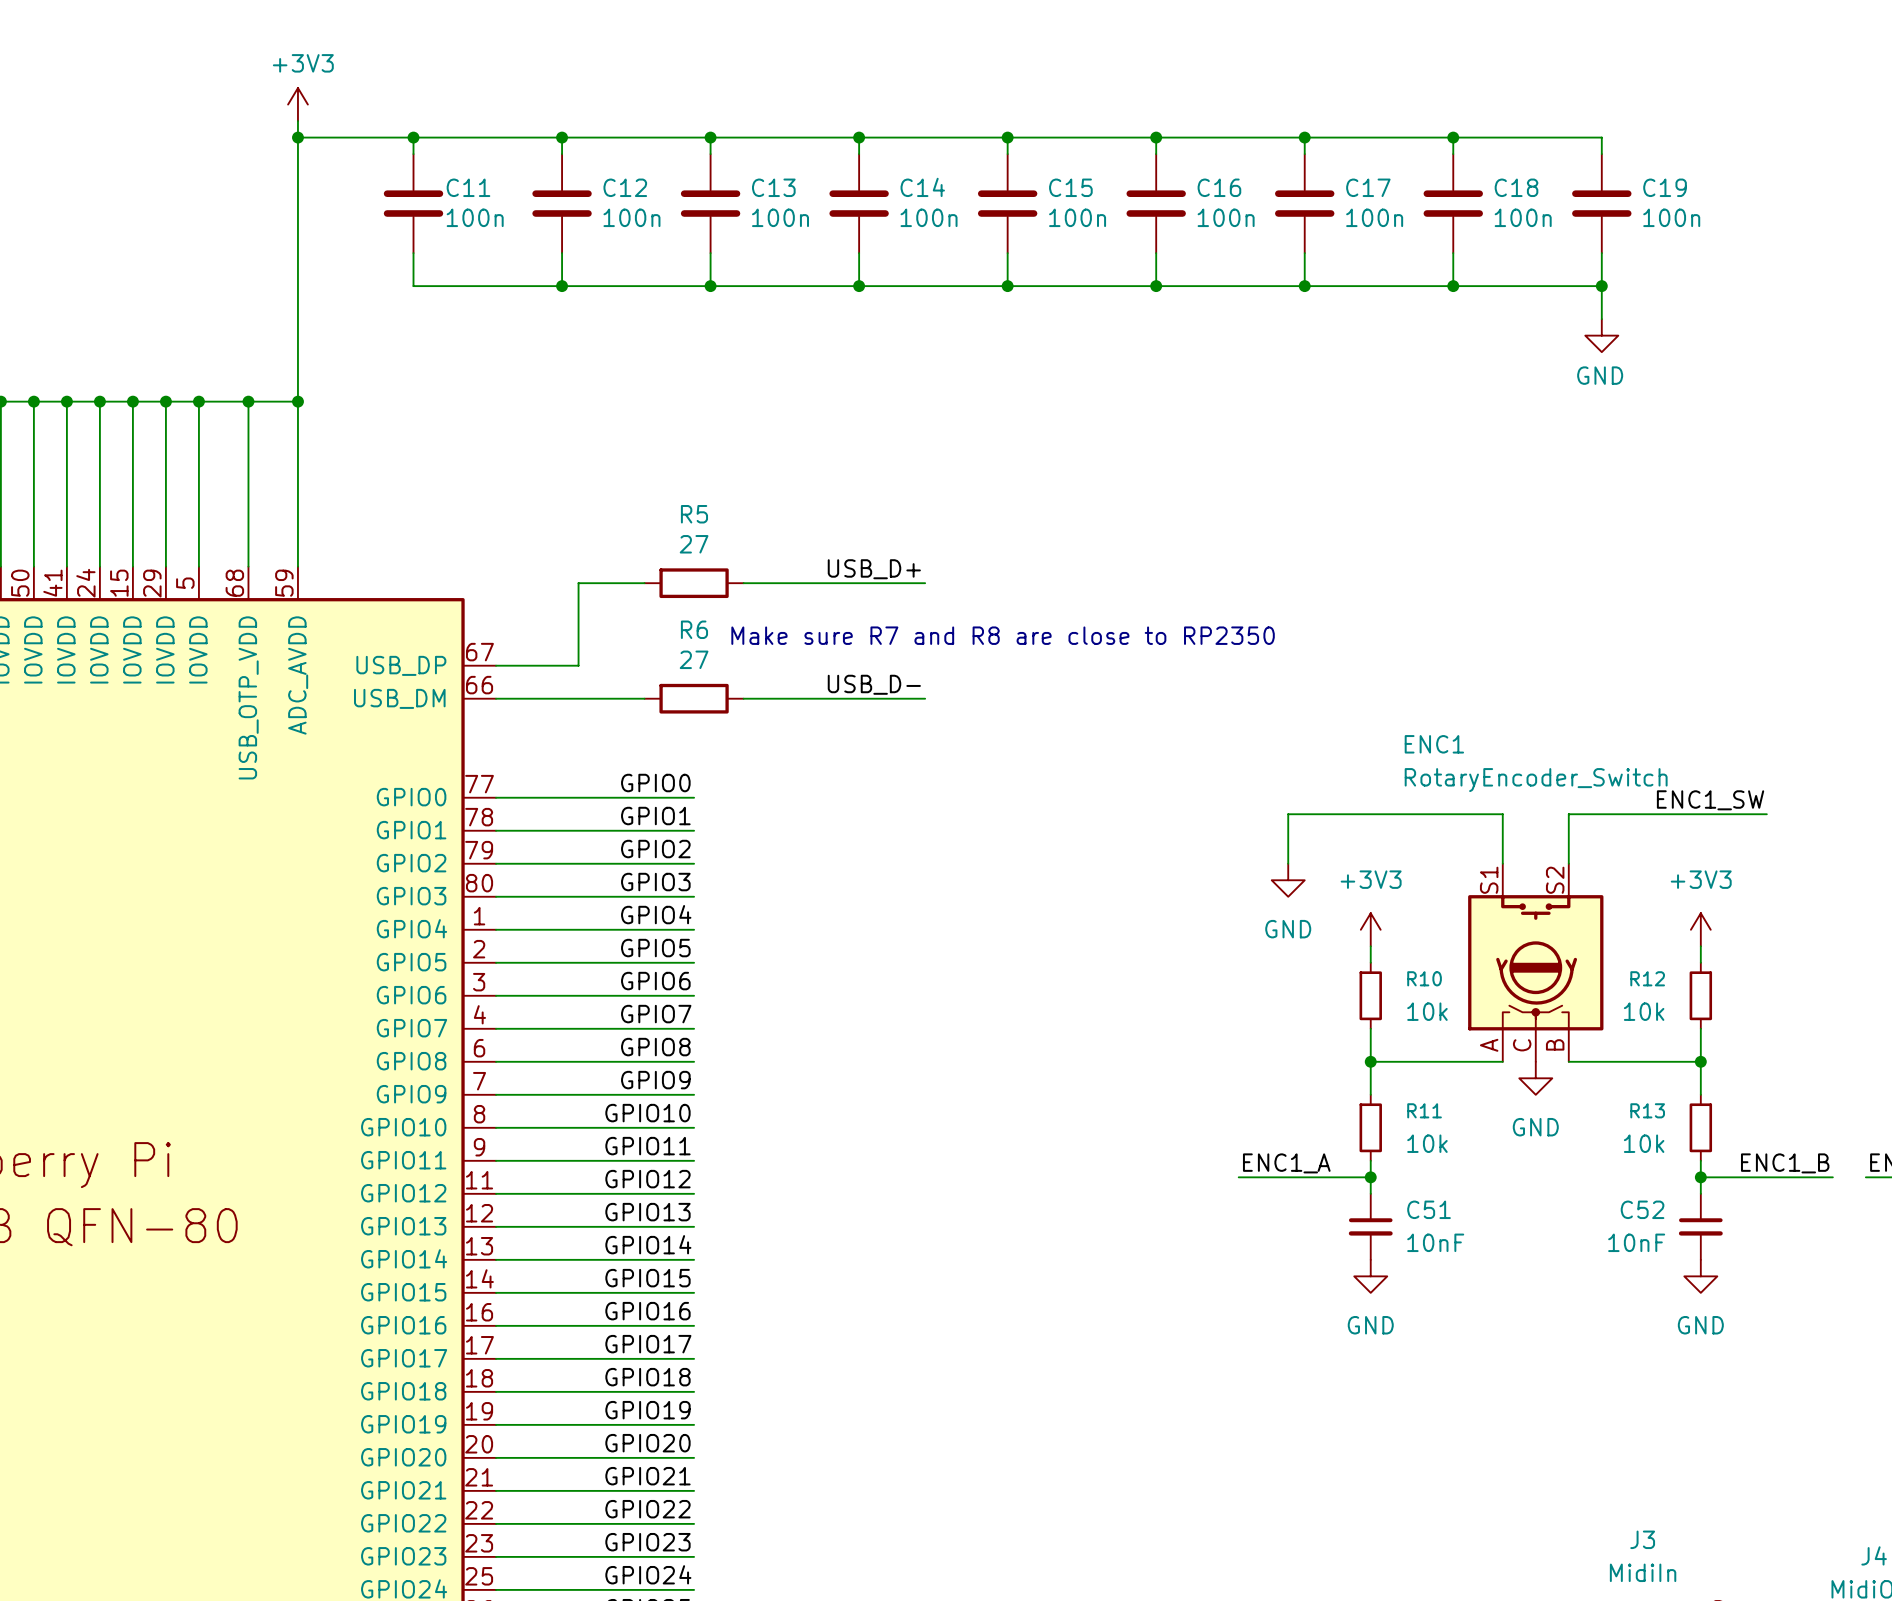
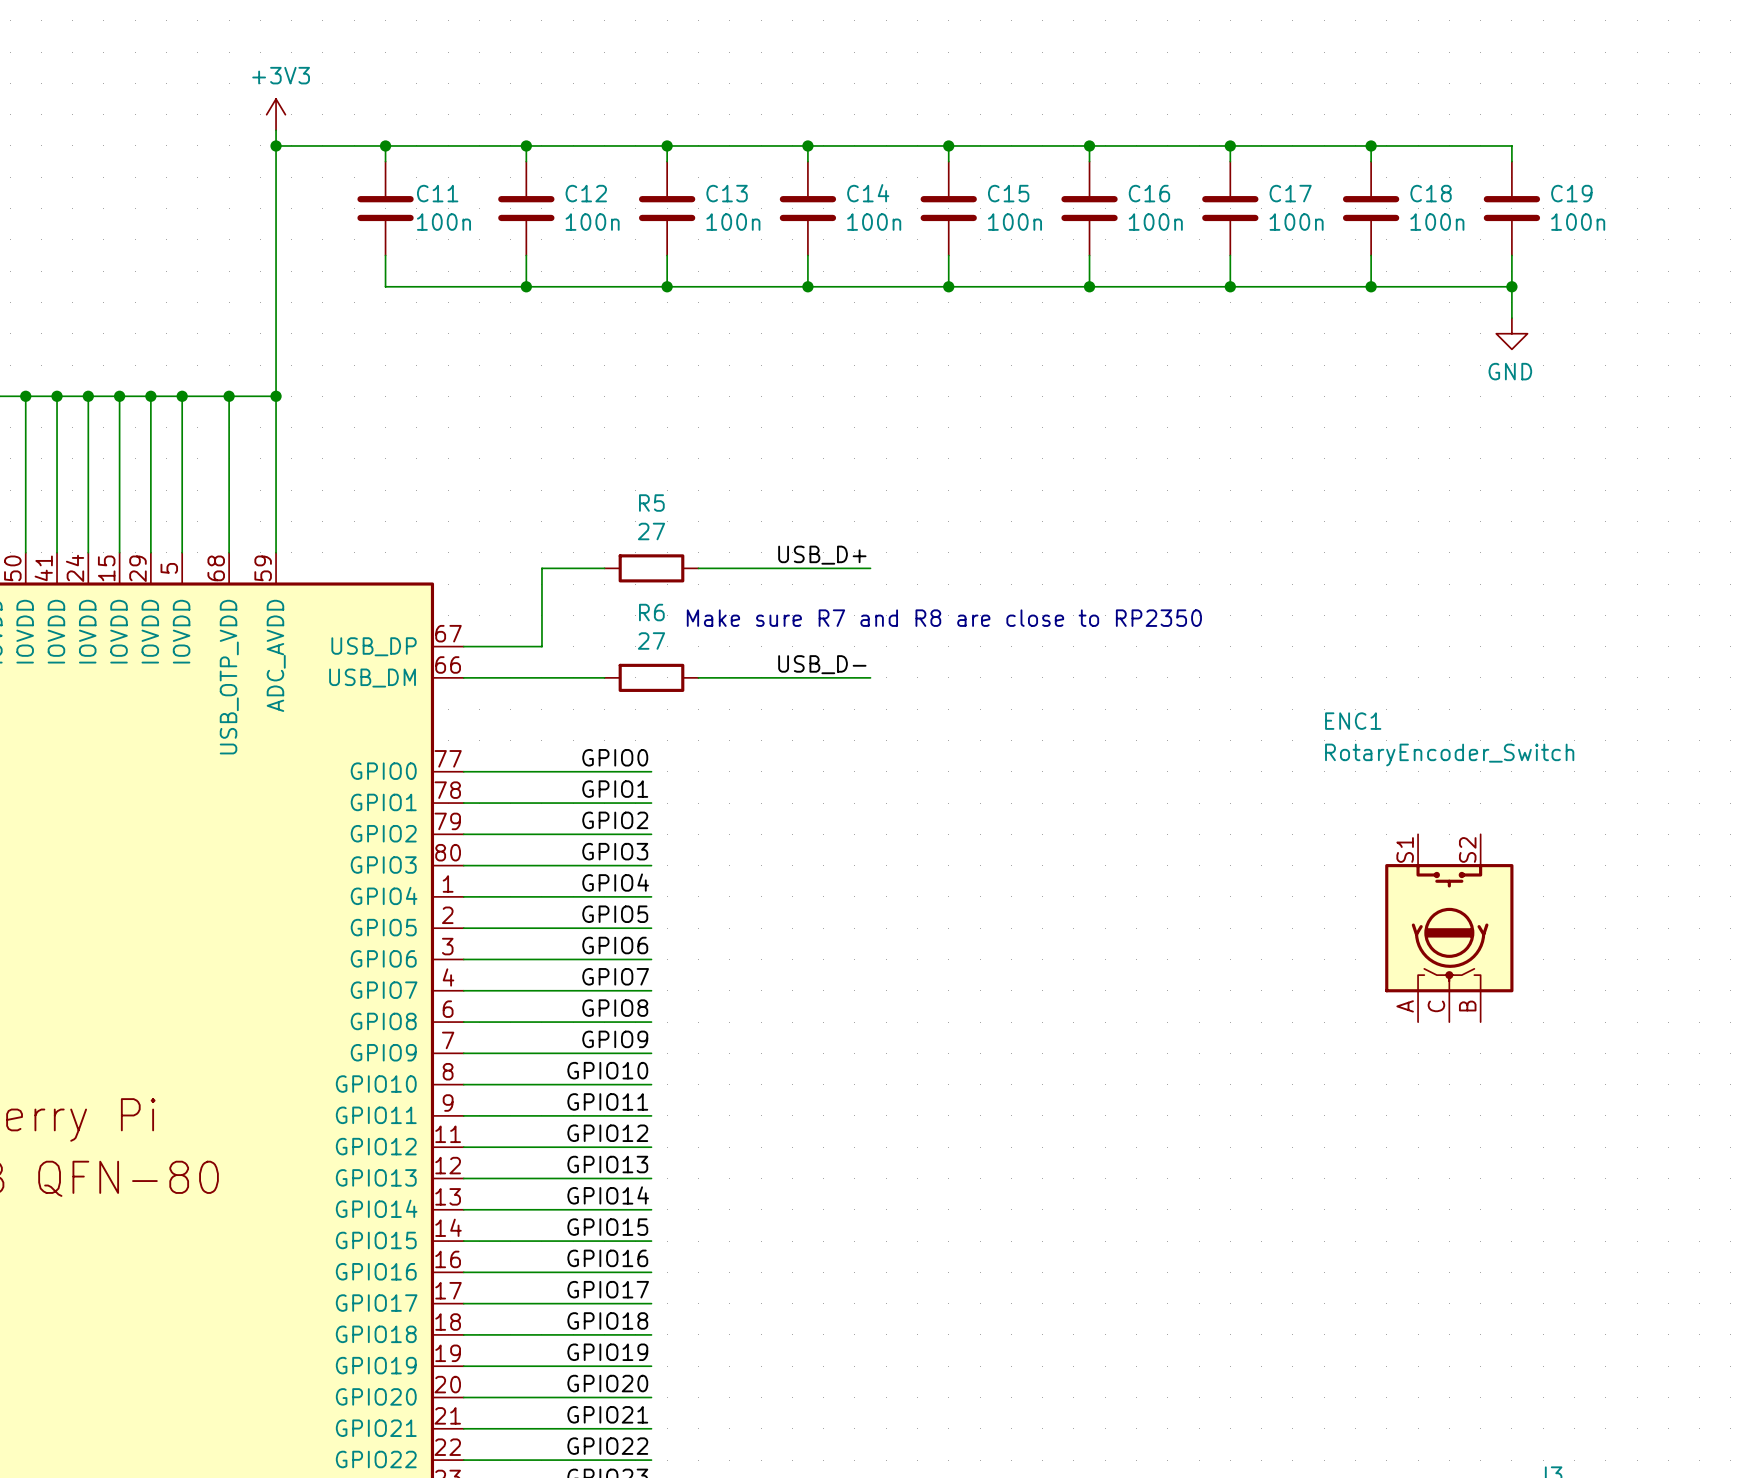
label: ENC1_SW (1710, 800) -> none
wire: (1766, 814) (1568, 814) (1568, 863) -> none
wire: (1288, 863) (1288, 814) (1502, 814) (1502, 863) -> none
power symbol: GND (1288, 880) -> none
power symbol: +3V3 (1370, 929) -> none
power symbol: +3V3 (1700, 929) -> none
wire: (1370, 946) (1370, 962) -> none
wire: (1700, 946) (1700, 962) -> none
R10: 10k (1370, 995) -> none
R12: 10k (1700, 995) -> none
wire: (1370, 1028) (1370, 1094) -> none
wire: (1700, 1028) (1700, 1094) -> none
wire: (1370, 1061) (1502, 1061) -> none
junction: (1370, 1061) -> none
wire: (1568, 1061) (1700, 1061) -> none
junction: (1700, 1061) -> none
power symbol: GND (1535, 1078) -> none
R11: 10k (1370, 1127) -> none
R13: 10k (1700, 1127) -> none
wire: (1370, 1160) (1370, 1193) -> none
wire: (1700, 1160) (1700, 1193) -> none
label: ENC1_A (1286, 1163) -> none
label: ENC1_B (1785, 1163) -> none
wire: (1238, 1177) (1370, 1177) -> none
junction: (1370, 1177) -> none
wire: (1700, 1177) (1832, 1177) -> none
junction: (1700, 1177) -> none
C51: 10nF (1370, 1226) -> none
C52: 10nF (1700, 1226) -> none
power symbol: GND (1370, 1276) -> none
power symbol: GND (1700, 1276) -> none

